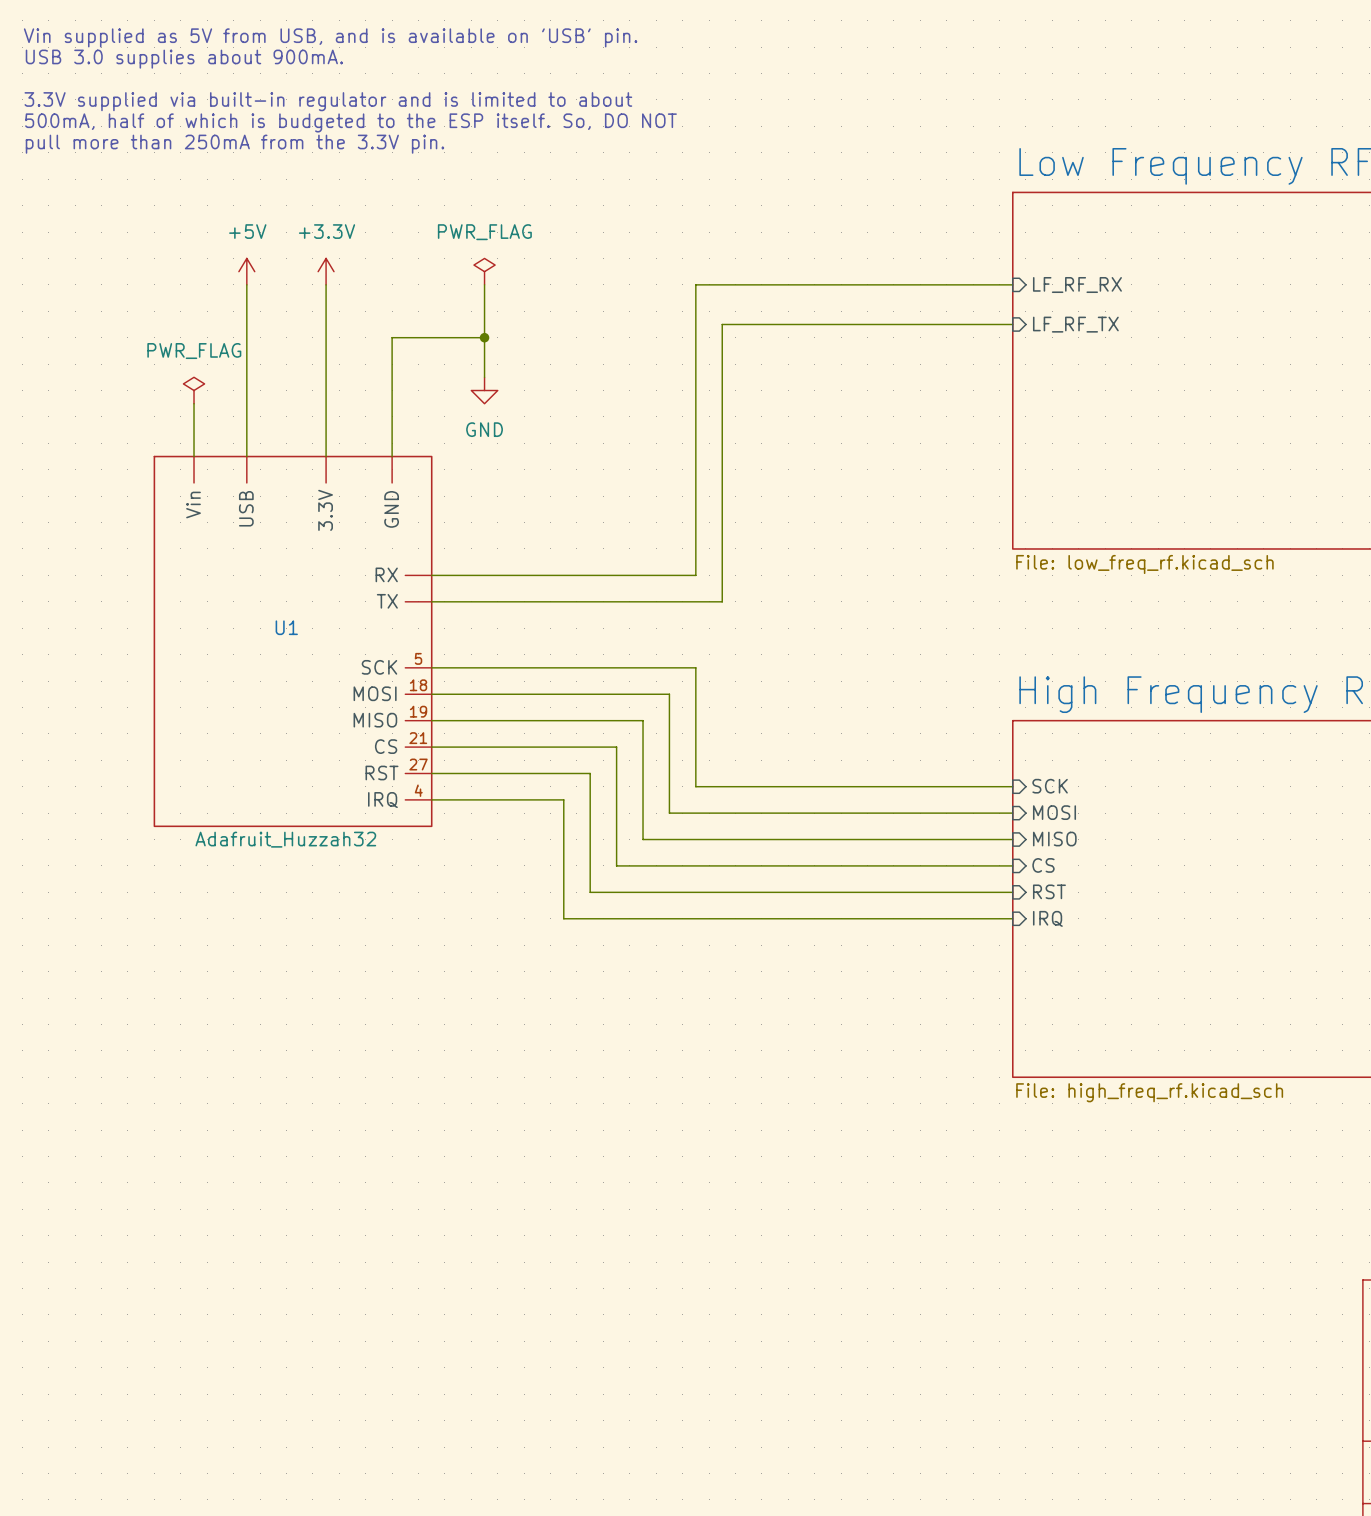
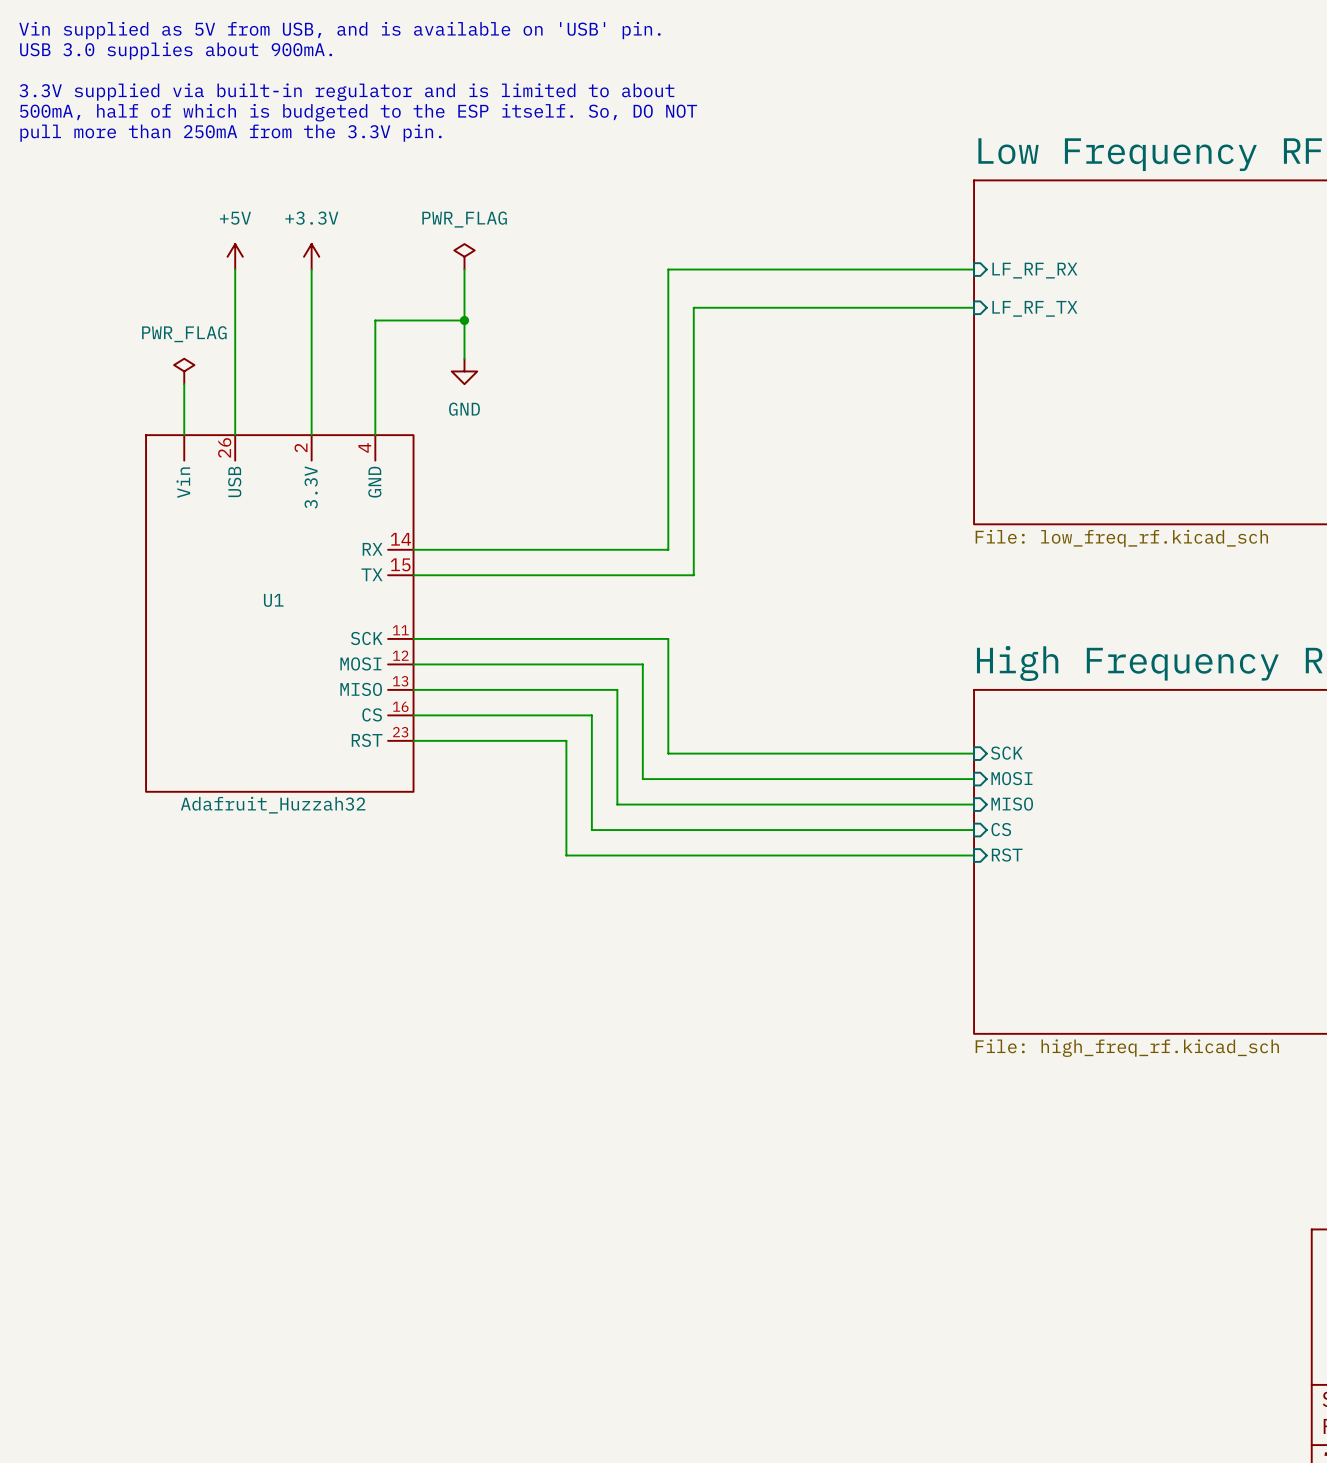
U1 symbol: [153, 455, 433, 828] -> [145, 434, 415, 793]
wire: (431, 799) (563, 799) (563, 918) (1012, 918) -> none
sheet pin: IRQ (1047, 918) -> none

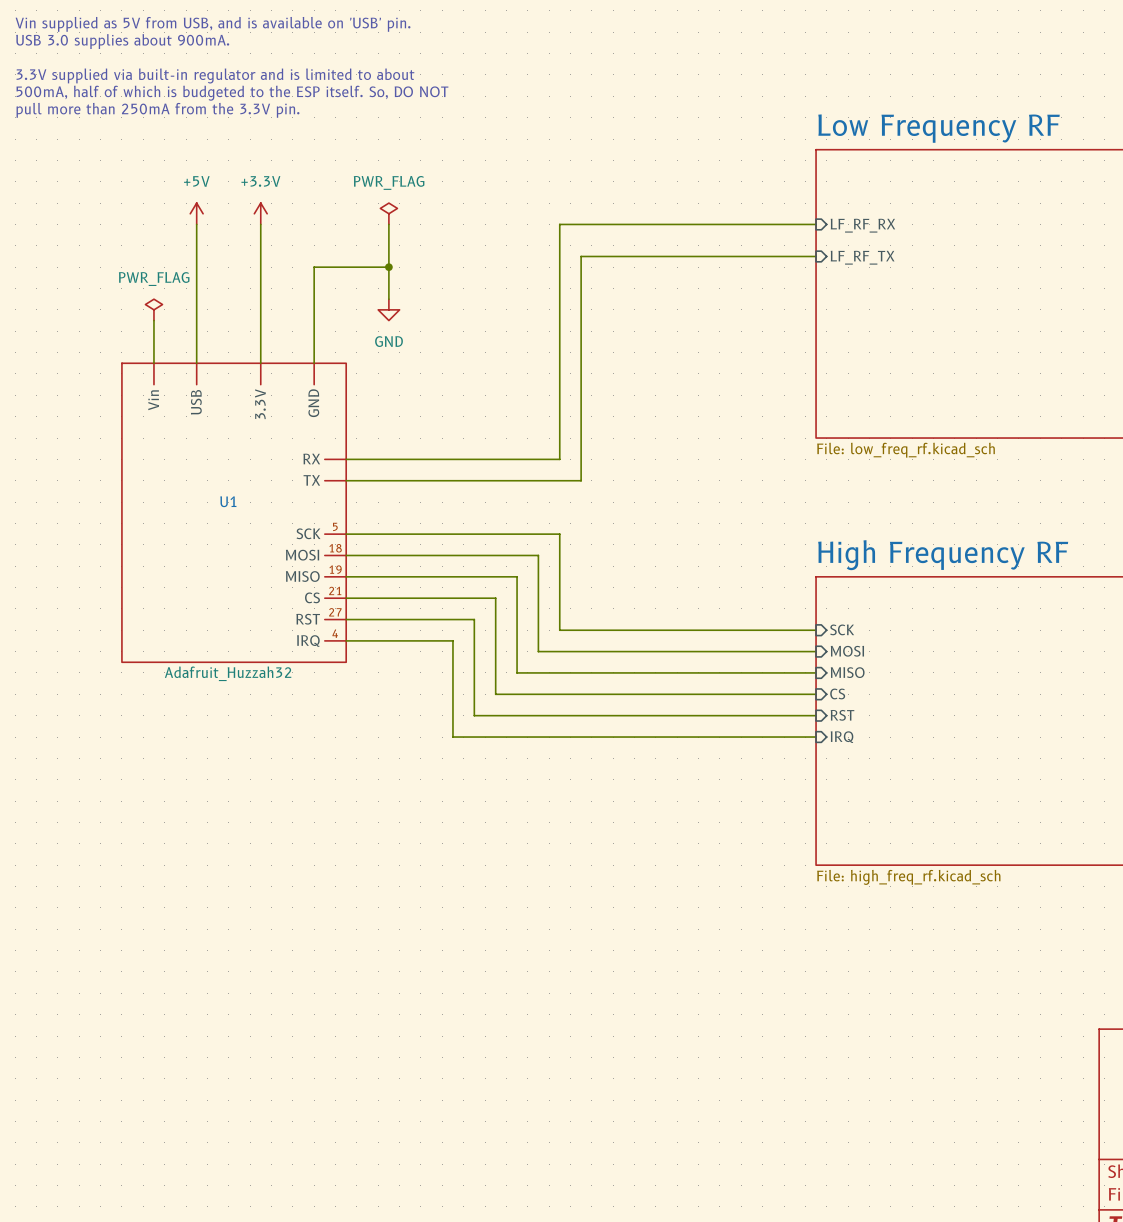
U1 symbol: [145, 434, 415, 793] -> [121, 362, 347, 663]
wire: none -> (346, 640) (452, 640) (452, 737) (816, 737)
sheet pin: none -> IRQ (842, 737)

